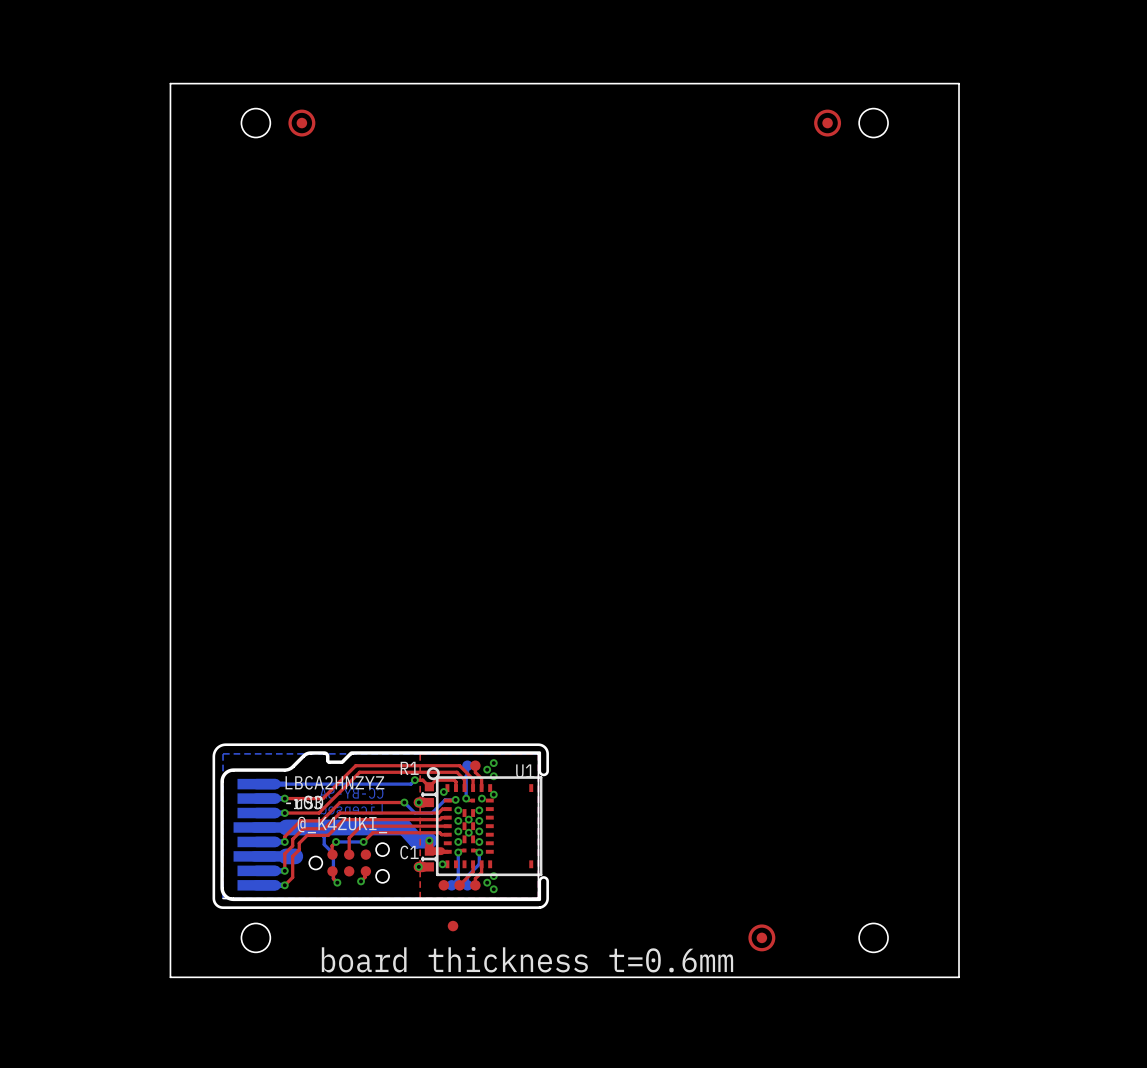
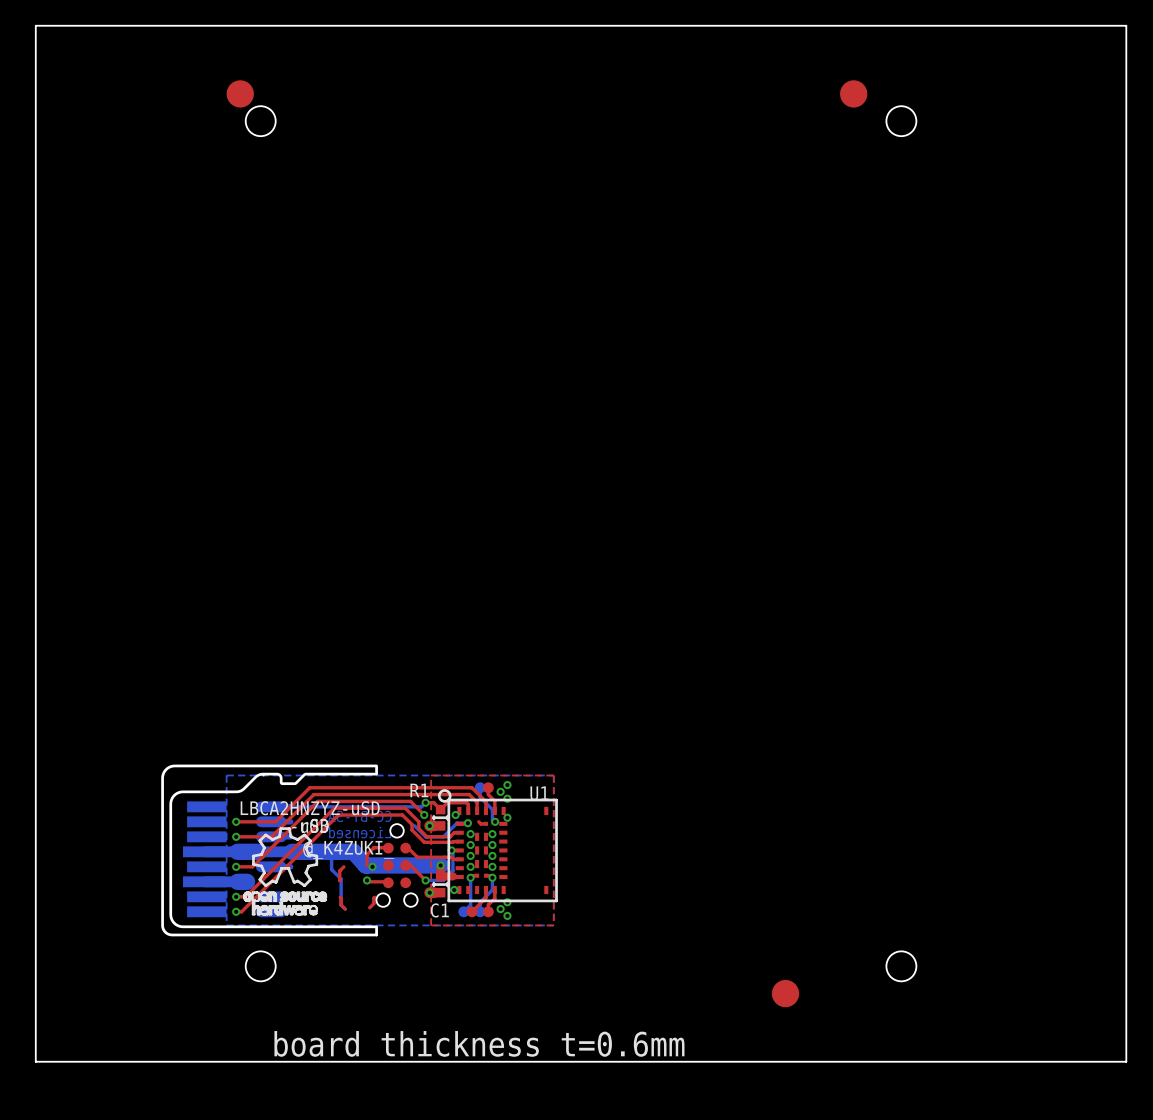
board edge: (170, 83) (170, 977) (959, 977) (959, 83) (170, 83) -> (35, 25) (35, 1061) (1126, 1061) (1126, 25) (35, 25)
part: none -> (240, 93)
part: none -> (853, 93)
drawing: [288, 109, 316, 137] -> none
drawing: [814, 109, 842, 137] -> none
part: (301, 123) -> none
part: (827, 123) -> none
top track: (355, 765) (322, 798) (284, 798) -> (364, 787) (309, 787) (275, 821) (236, 821)
top track: (359, 772) (318, 813) (284, 813) -> (368, 794) (313, 794) (271, 836) (236, 836)
bottom track: (467, 774) (466, 798) -> (480, 797) (492, 809) (492, 821)
text: LBCA2HNZYZ (334, 782) -> LBCA2HNZYZ-uSD (310, 808)
top track: none -> (424, 815) (410, 801) (317, 801) (252, 866) (236, 866)
via: none -> (236, 821)
via: (284, 798) -> none
via: (466, 798) -> none
top track: (404, 802) (339, 802) (321, 820) (300, 820) (284, 836) (284, 841) -> none
via position: (404, 802) -> (424, 815)
line: none -> (281, 828) (279, 836) (272, 839) (265, 835) (260, 840) (264, 847) (261, 854) (253, 856) (253, 864) (261, 866) (264, 873) (260, 879) (265, 885) (272, 881) (276, 882) (281, 868) (288, 868) (294, 882) (297, 881) (304, 885) (310, 879) (305, 873) (308, 866) (316, 864) (316, 856) (308, 854) (305, 847) (310, 840) (304, 835) (297, 839) (290, 836) (289, 828) (281, 828)
via: none -> (236, 836)
via: (284, 813) -> none
top track: (416, 813) (339, 813) (324, 828) (303, 828) (292, 839) (292, 845) (284, 853) (284, 870) -> (427, 836) (418, 828) (418, 821) (405, 808) (334, 808) (245, 896) (236, 896)
top track: (441, 818) (343, 819) (328, 835) (307, 835) (299, 843) (299, 849) (292, 856) (292, 877) (284, 885) -> (452, 842) (424, 842) (412, 830) (412, 824) (402, 815) (338, 815) (241, 911) (236, 911)
via: (468, 819) -> none
top track: none -> (388, 848) (373, 847) (367, 854) (367, 865)
part: none -> (269, 850)
part: (380, 826) -> none
top track: (439, 826) (361, 826) (349, 838) (349, 854) -> none
bottom track: none -> (451, 850) (452, 870) (443, 880) (425, 880)
via: none -> (451, 850)
bottom track: none -> (204, 851) (259, 851)
bottom track: (345, 827) (404, 827) (416, 840) -> (353, 851) (365, 865) (427, 865)
top track: (407, 832) (372, 832) (363, 841) -> (417, 857) (407, 847) (405, 848)
via: (468, 832) -> none
top track: none -> (405, 865) (409, 864) (425, 880)
via: none -> (236, 866)
via: (284, 841) -> none
bottom track: (336, 841) (363, 841) -> none
via: (336, 841) -> none
C1 name position: C1 (409, 852) -> C1 (439, 910)
top track: none -> (367, 880) (388, 882)
via: none -> (367, 880)
via: none -> (425, 880)
bottom track: (254, 856) (295, 856) -> (204, 881) (247, 881)
part rotation: 0° (349, 862) -> 90° clockwise (397, 865)
line: none -> (246, 892) (244, 898) (248, 900) (251, 894) (246, 892)
line: none -> (252, 892) (259, 894) (258, 899) (254, 900) (254, 906) (259, 907) (259, 914) (257, 914) (256, 907) (254, 914) (252, 914) (252, 892)
line: none -> (264, 892) (260, 896) (264, 901) (267, 899) (262, 897) (267, 895) (264, 892)
line: none -> (284, 892) (281, 895) (286, 898) (280, 899) (284, 901) (287, 898) (283, 895) (287, 893) (284, 892)
line: none -> (291, 892) (289, 898) (293, 900) (295, 894) (291, 892)
line: none -> (297, 892) (299, 892) (300, 899) (302, 892) (304, 892) (304, 900) (298, 900) (297, 892)
line: none -> (306, 892) (311, 893) (308, 895) (307, 900) (306, 900) (306, 892)
line: none -> (315, 892) (311, 896) (315, 901) (318, 899) (313, 897) (314, 894) (318, 893) (315, 892)
line: none -> (322, 892) (319, 896) (322, 901) (325, 899) (320, 897) (326, 895) (322, 892)
line: none -> (271, 893) (269, 892) (269, 900) (271, 900) (272, 894) (274, 900) (276, 900) (275, 894) (271, 893)
line: none -> (247, 894) (249, 896) (247, 899) (245, 896) (247, 894)
line: none -> (292, 894) (294, 896) (292, 899) (290, 896) (292, 894)
line: none -> (322, 894) (324, 895) (320, 895) (321, 894) (322, 894)
via: none -> (236, 896)
via: (284, 870) -> none
line: none -> (280, 902) (280, 906) (277, 905) (275, 908) (277, 914) (282, 914) (282, 902) (280, 902)
line: none -> (273, 905) (269, 905) (269, 914) (271, 914) (271, 907) (275, 906) (273, 905)
line: none -> (297, 905) (295, 907) (300, 909) (296, 910) (295, 912) (302, 914) (301, 907) (297, 905)
line: none -> (308, 905) (304, 905) (304, 914) (305, 914) (306, 907) (309, 906) (308, 905)
line: none -> (313, 905) (309, 910) (313, 914) (316, 913) (311, 910) (316, 909) (313, 905)
line: none -> (278, 907) (280, 908) (279, 912) (277, 912) (278, 907)
via: (361, 881) -> none
via: (337, 882) -> none
via: none -> (236, 911)
via: (284, 885) -> none
line: none -> (291, 911) (289, 905) (286, 911) (284, 905) (283, 905) (285, 914) (289, 908) (292, 914) (295, 905) (293, 905) (291, 911)
part: (443, 885) -> none
line: none -> (265, 913) (261, 912) (261, 910) (265, 909) (262, 906) (267, 907) (267, 914) (265, 913)
drawing: [748, 924, 776, 952] -> none
part: (453, 926) -> none
part: (761, 937) -> none
text position: board thickness t=0.6mm (527, 959) -> board thickness t=0.6mm (479, 1043)
part: none -> (785, 993)

